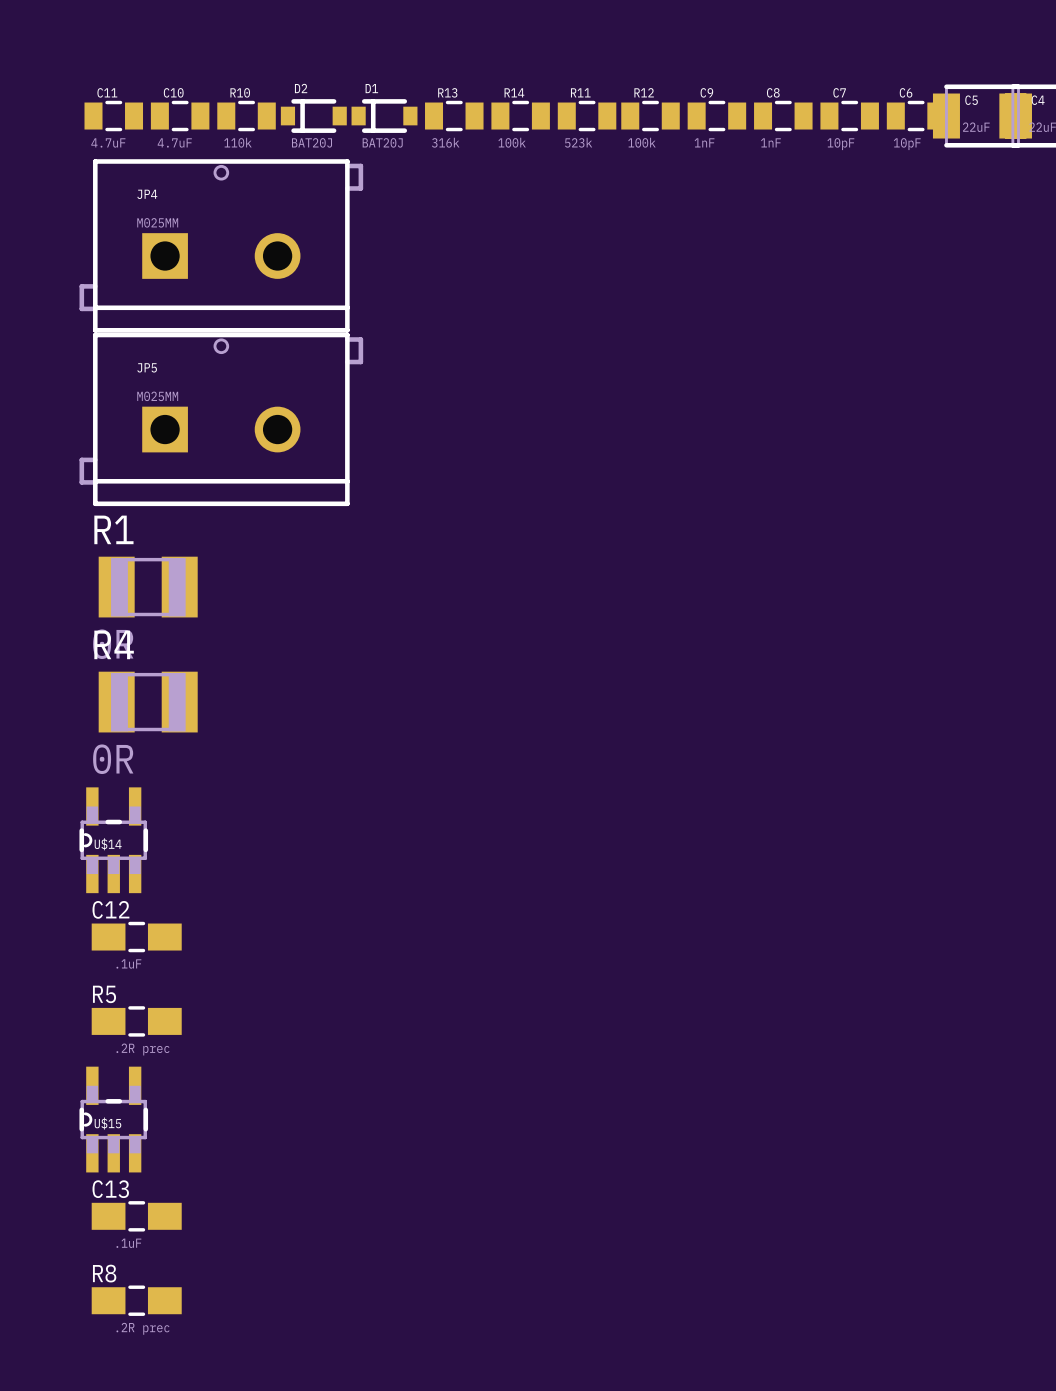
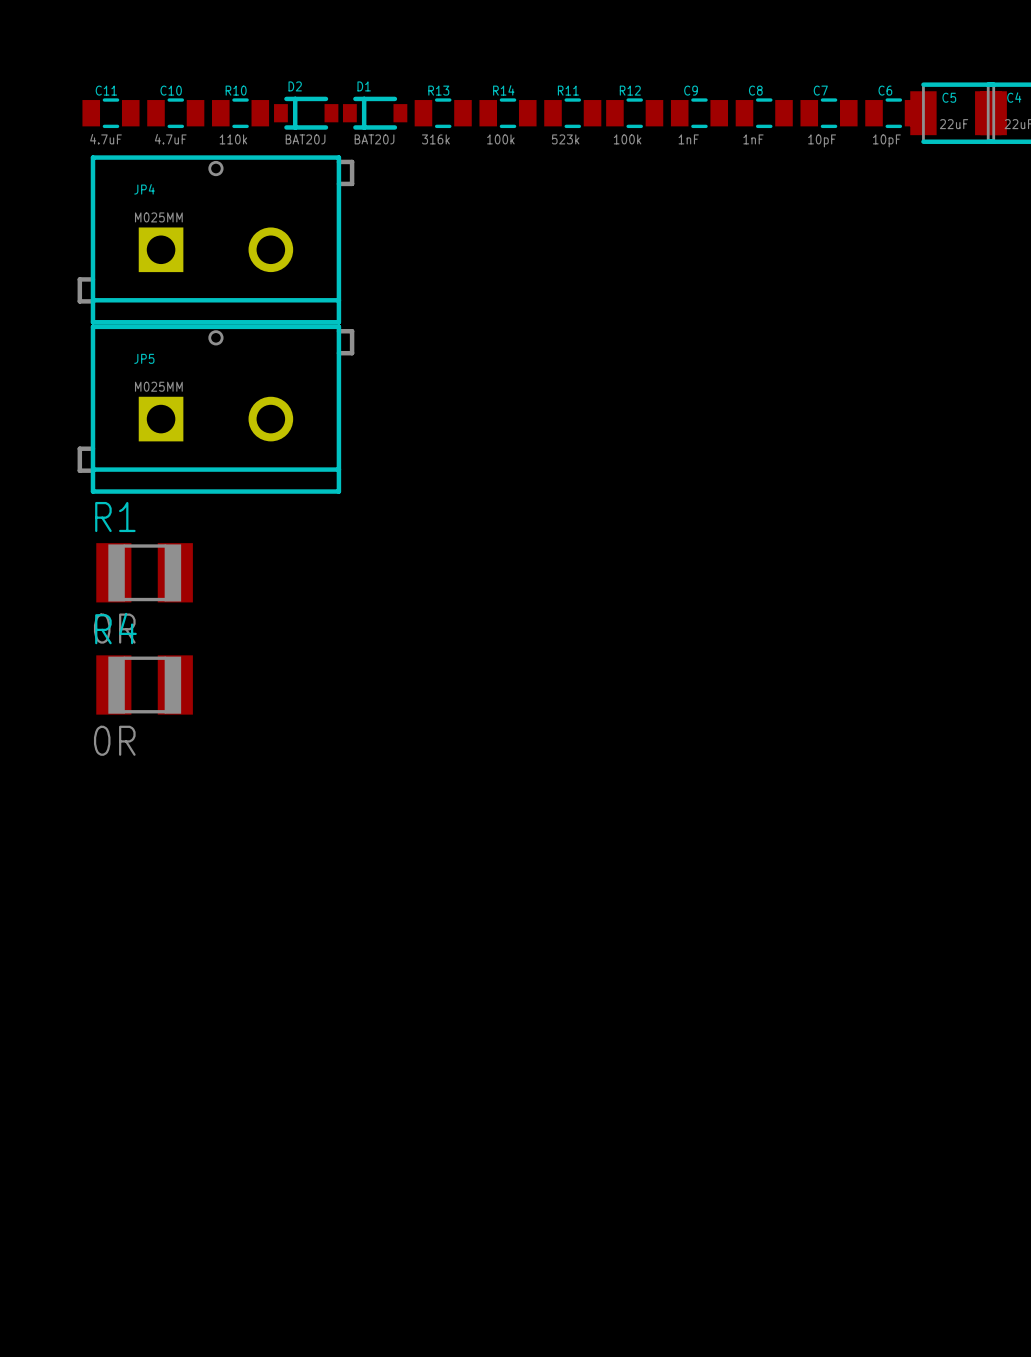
U$14: (113, 840) -> none
C12: .1uF (136, 937) -> none
R5: .2R prec (136, 1021) -> none
U$15: (113, 1119) -> none
C13: .1uF (136, 1216) -> none
R8: .2R prec (136, 1300) -> none

